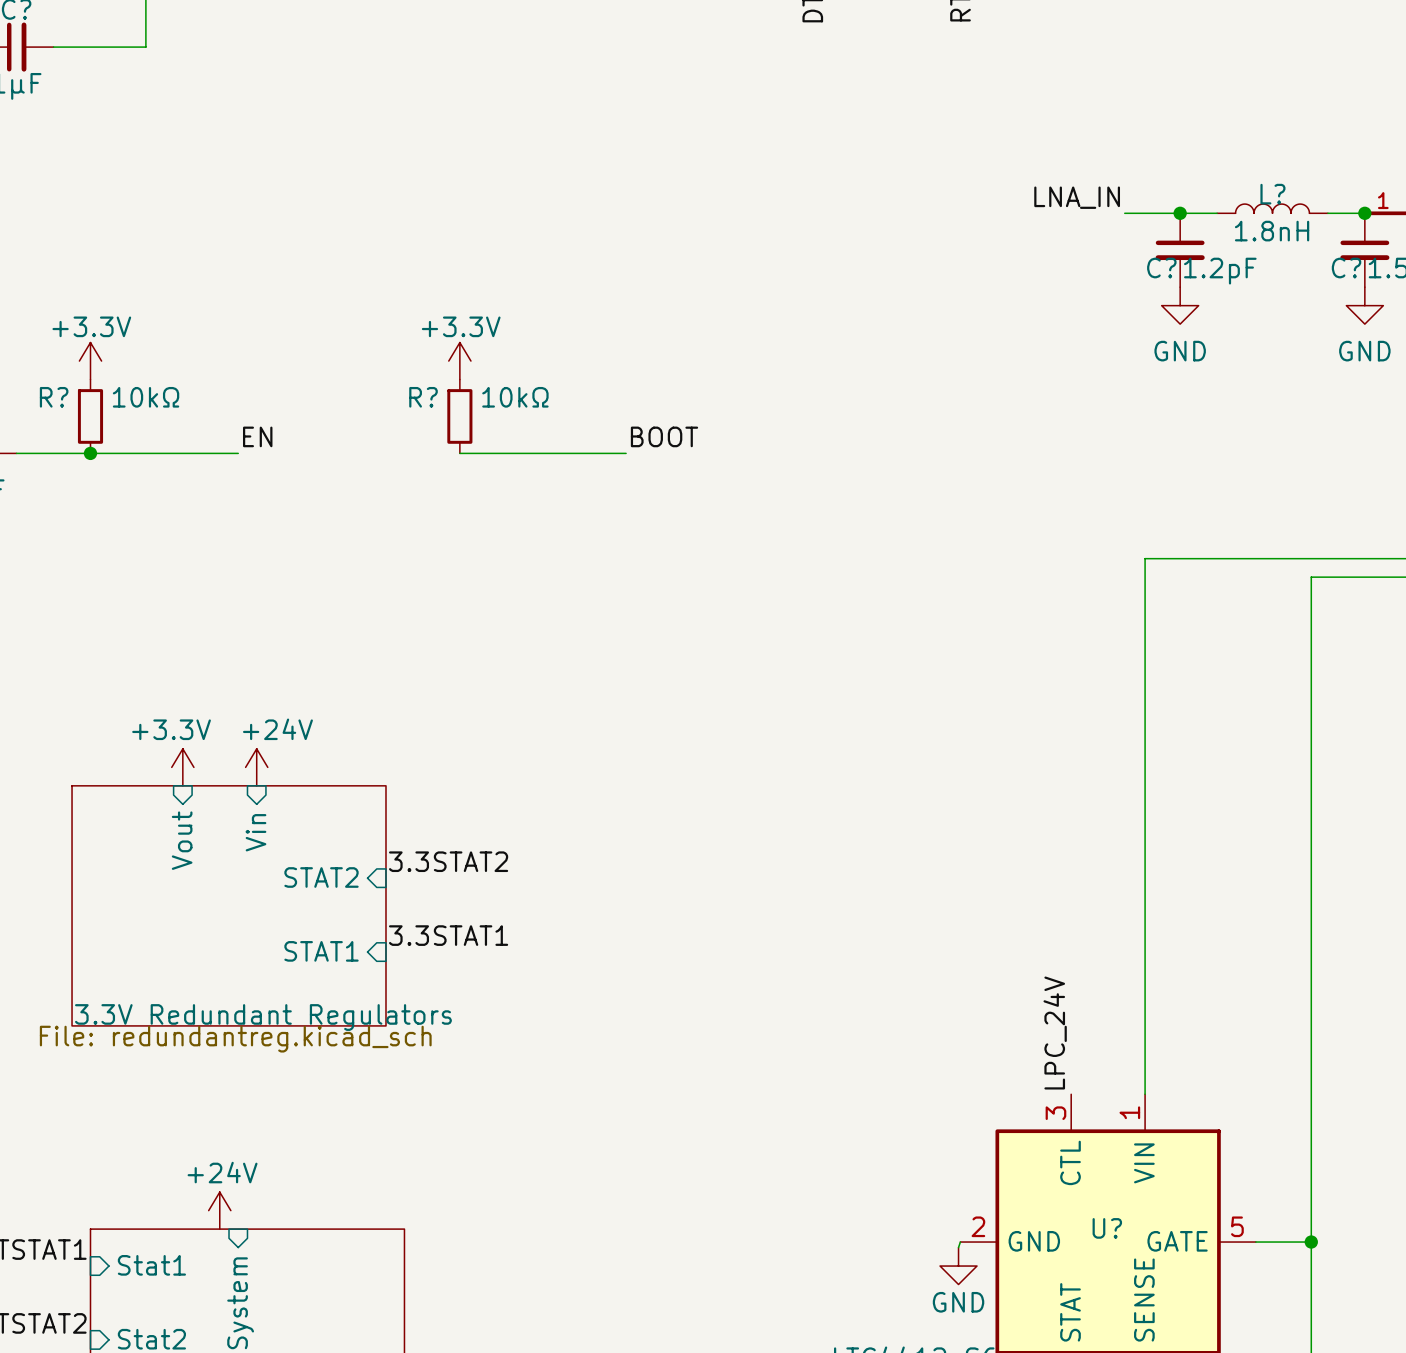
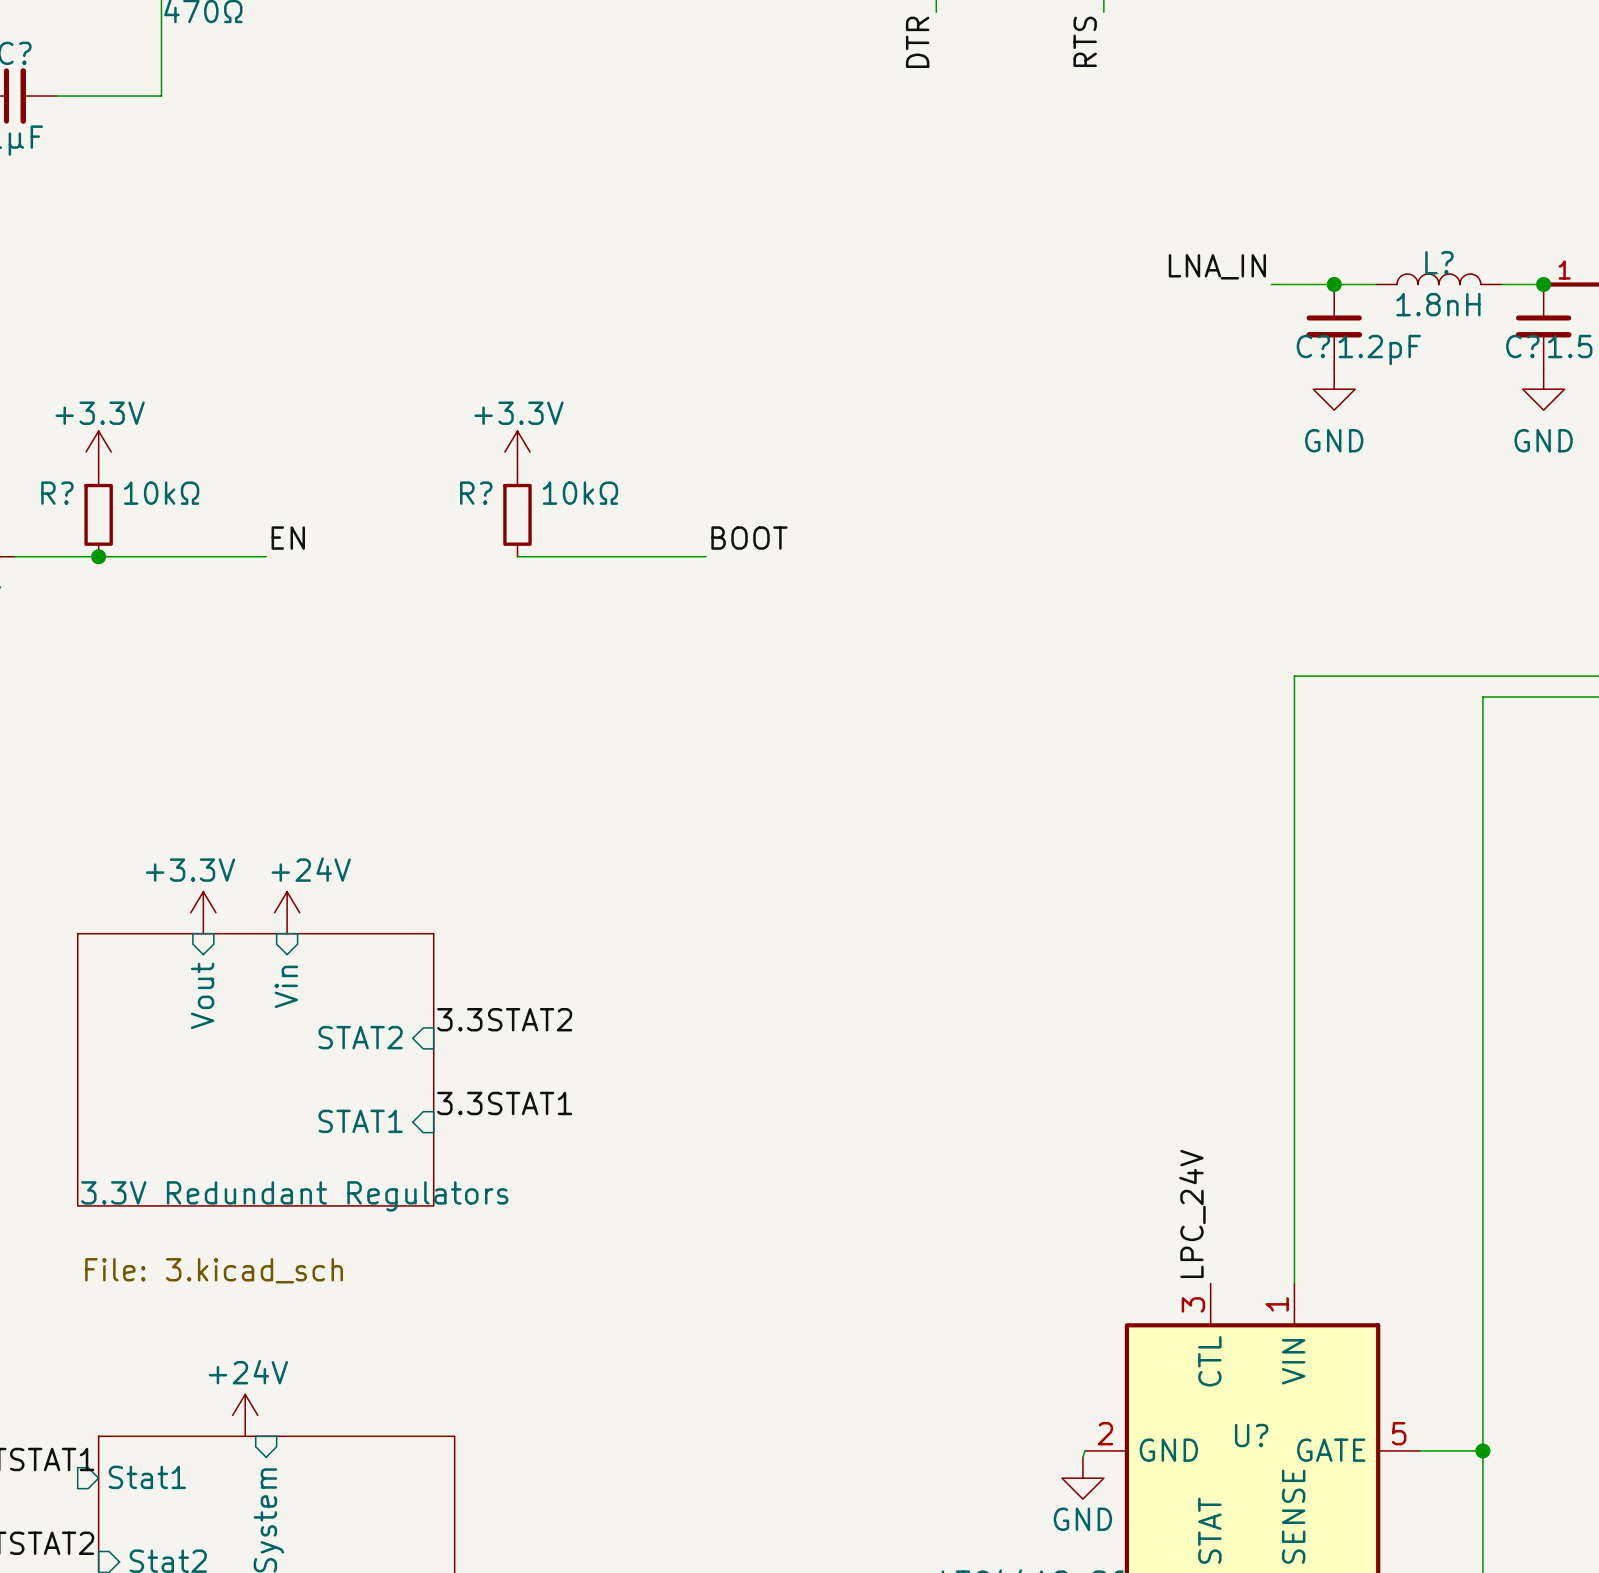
sheet 3.3V Redundant Regulators value: File: redundantreg.kicad_sch (235, 1039) -> File: 3.kicad_sch (214, 1270)
sheet pin position: Stat1 (151, 1265) -> Stat1 (147, 1477)

